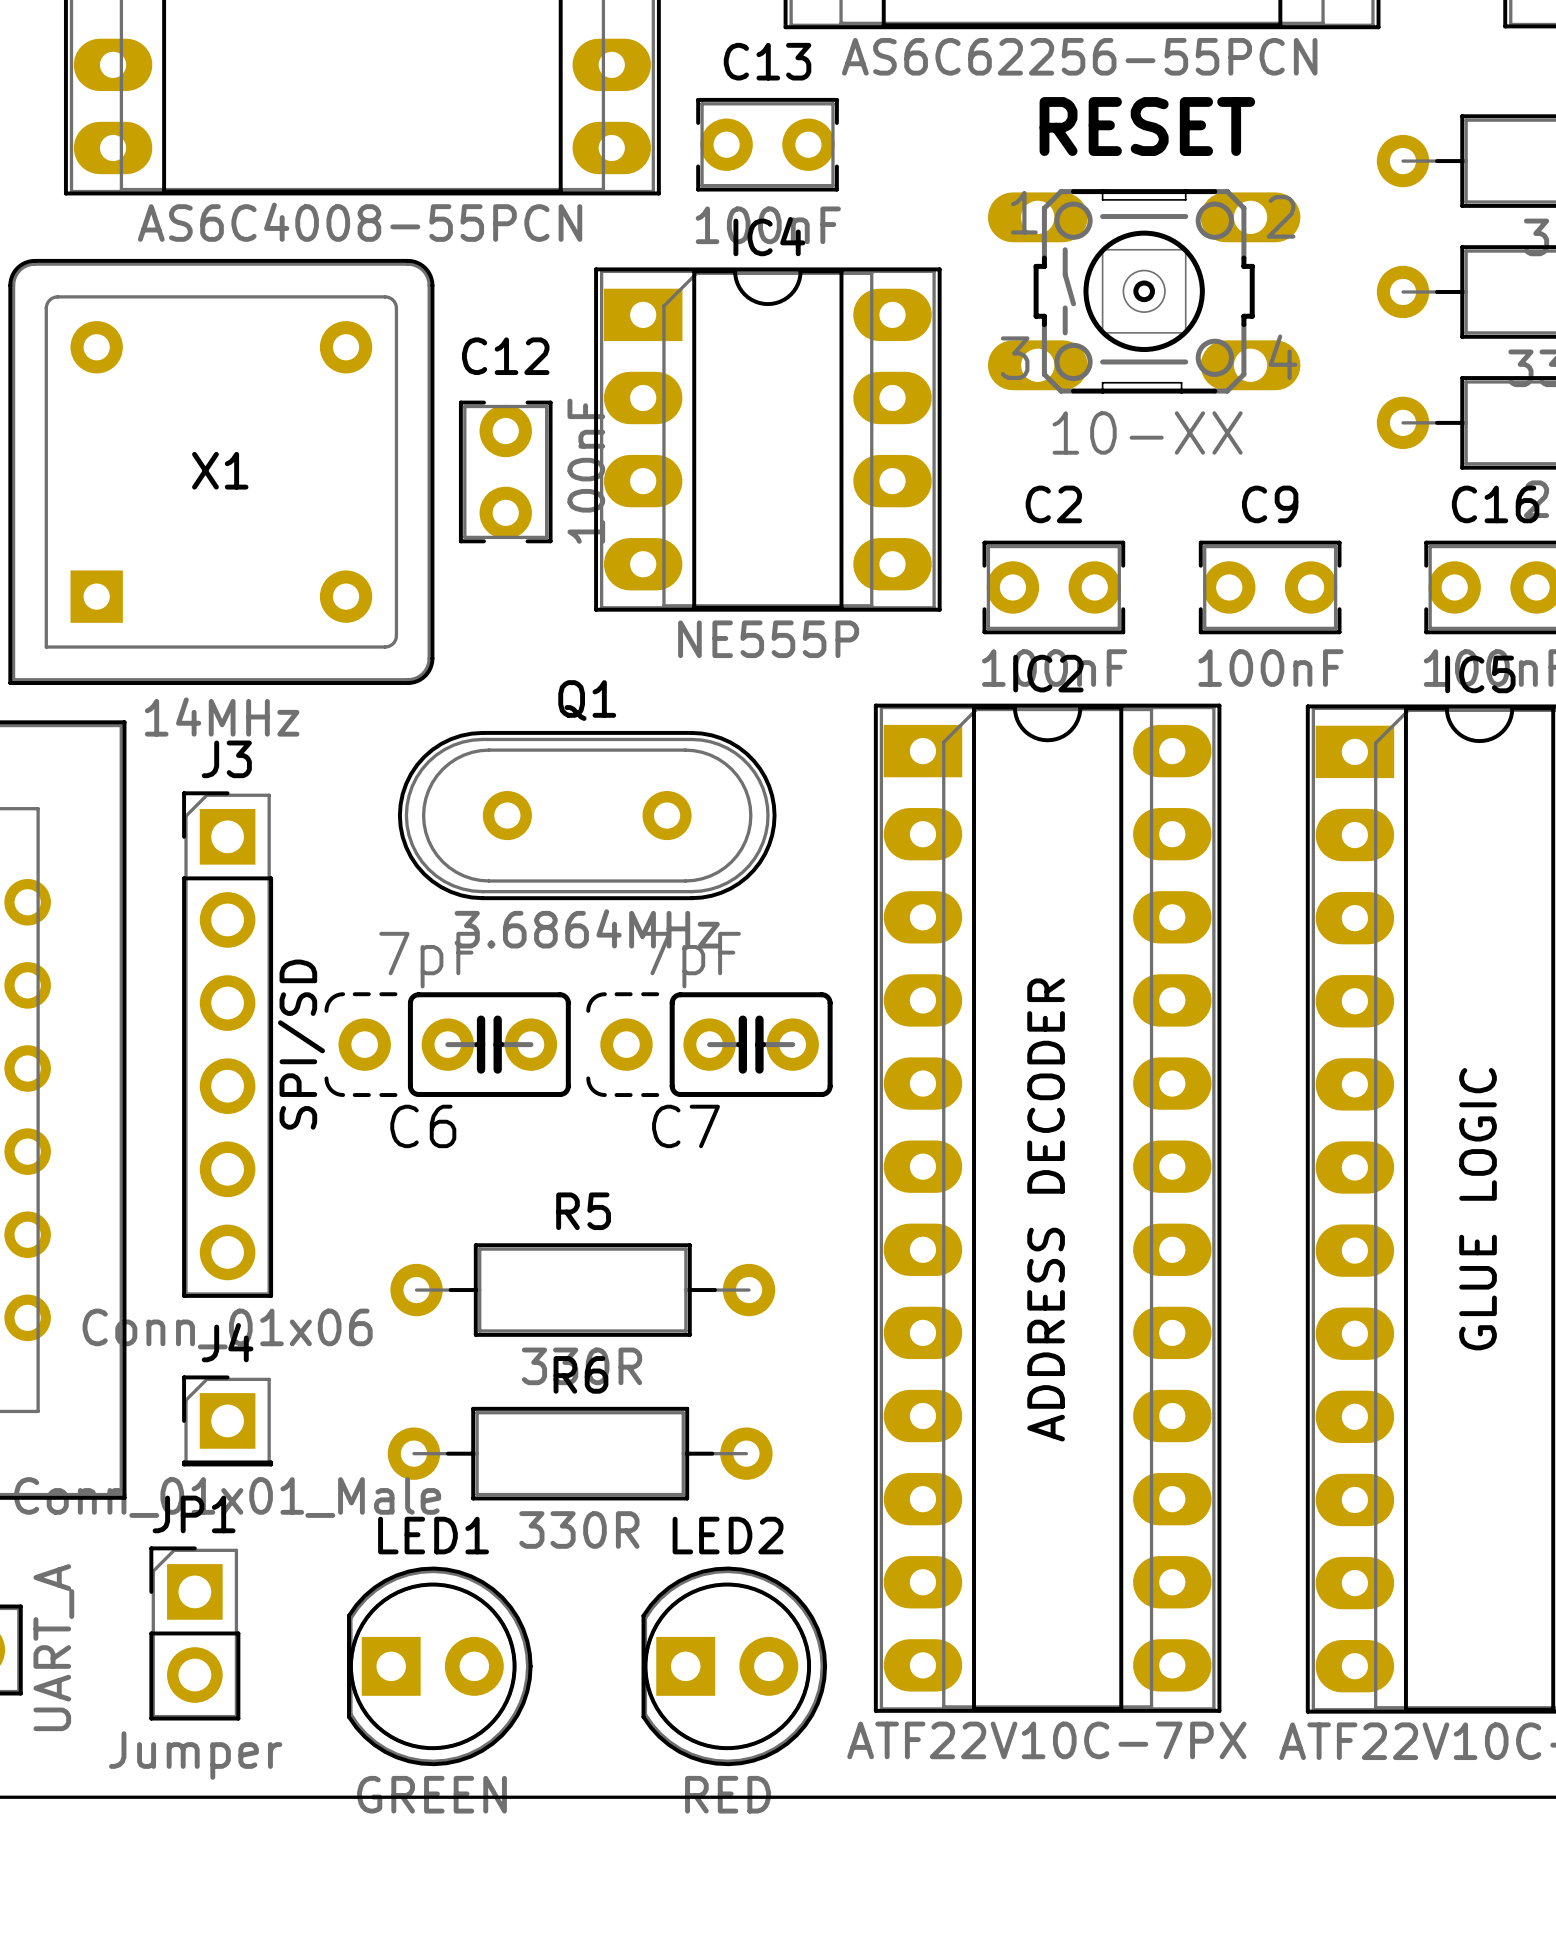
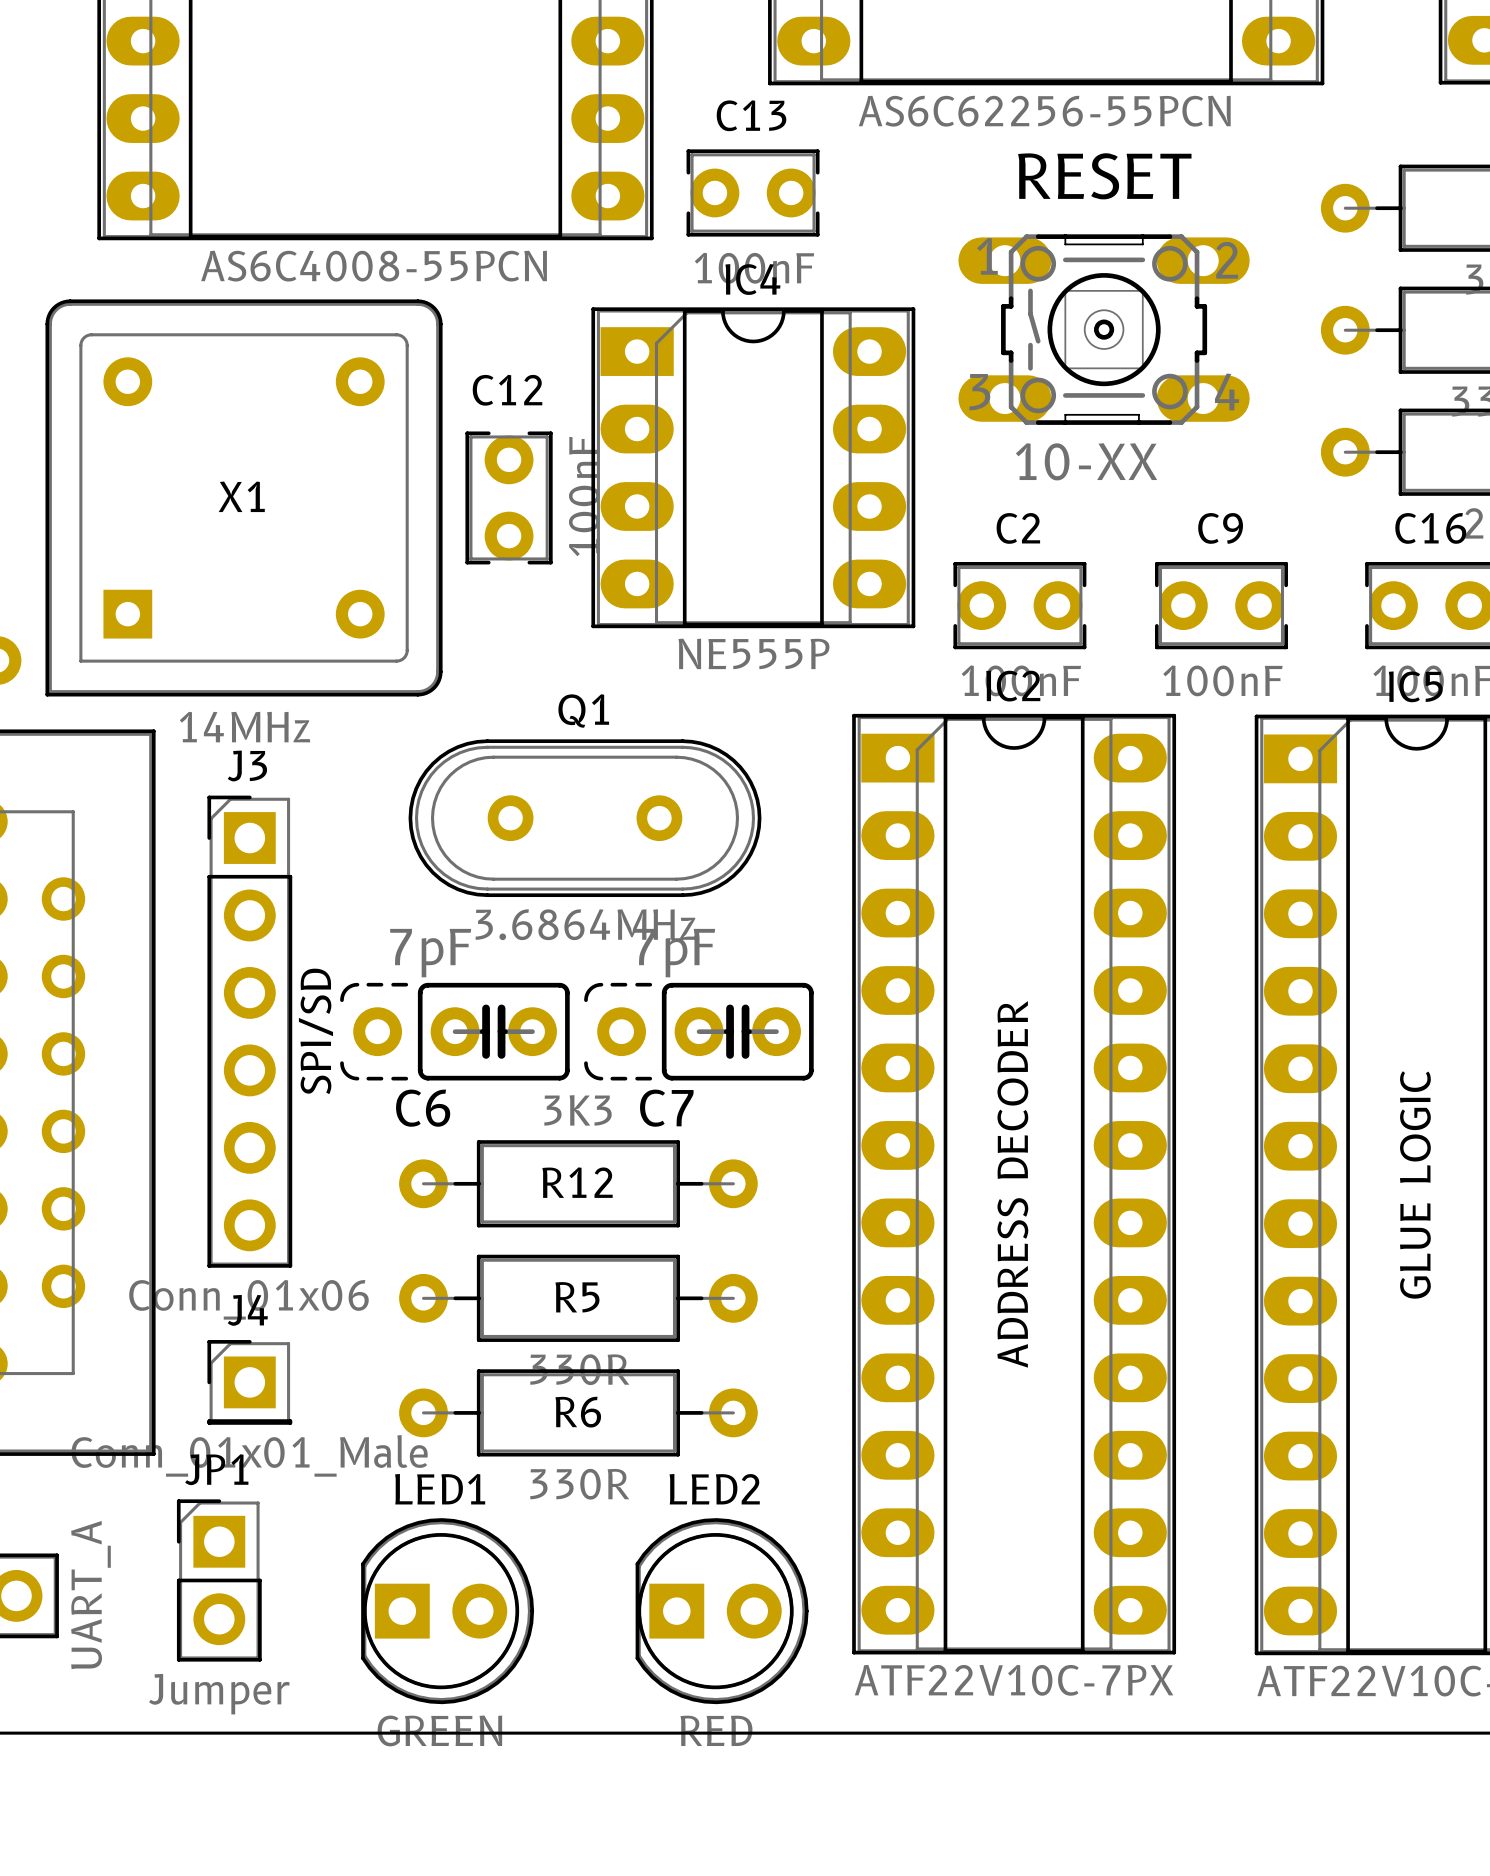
R12: none -> 3K3 (578, 1183)
R5 name position: R5 (583, 1211) -> R5 (577, 1297)
R5 position: (582, 1290) -> (578, 1298)
R6 name position: R6 (580, 1374) -> R6 (578, 1412)

